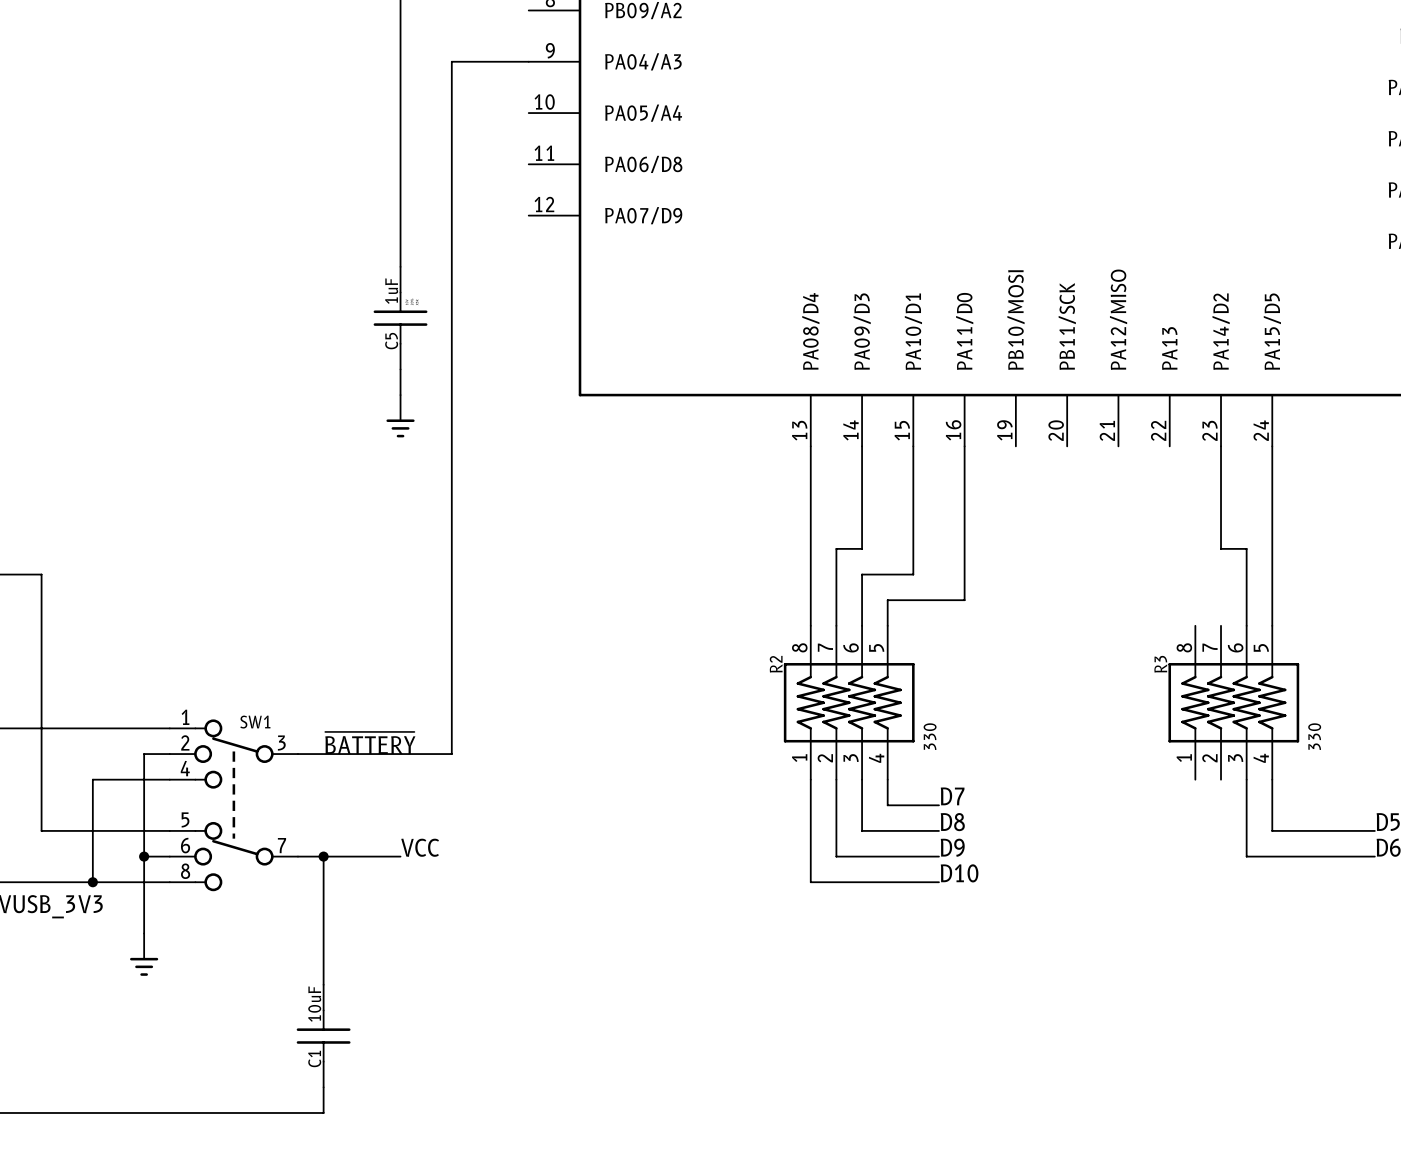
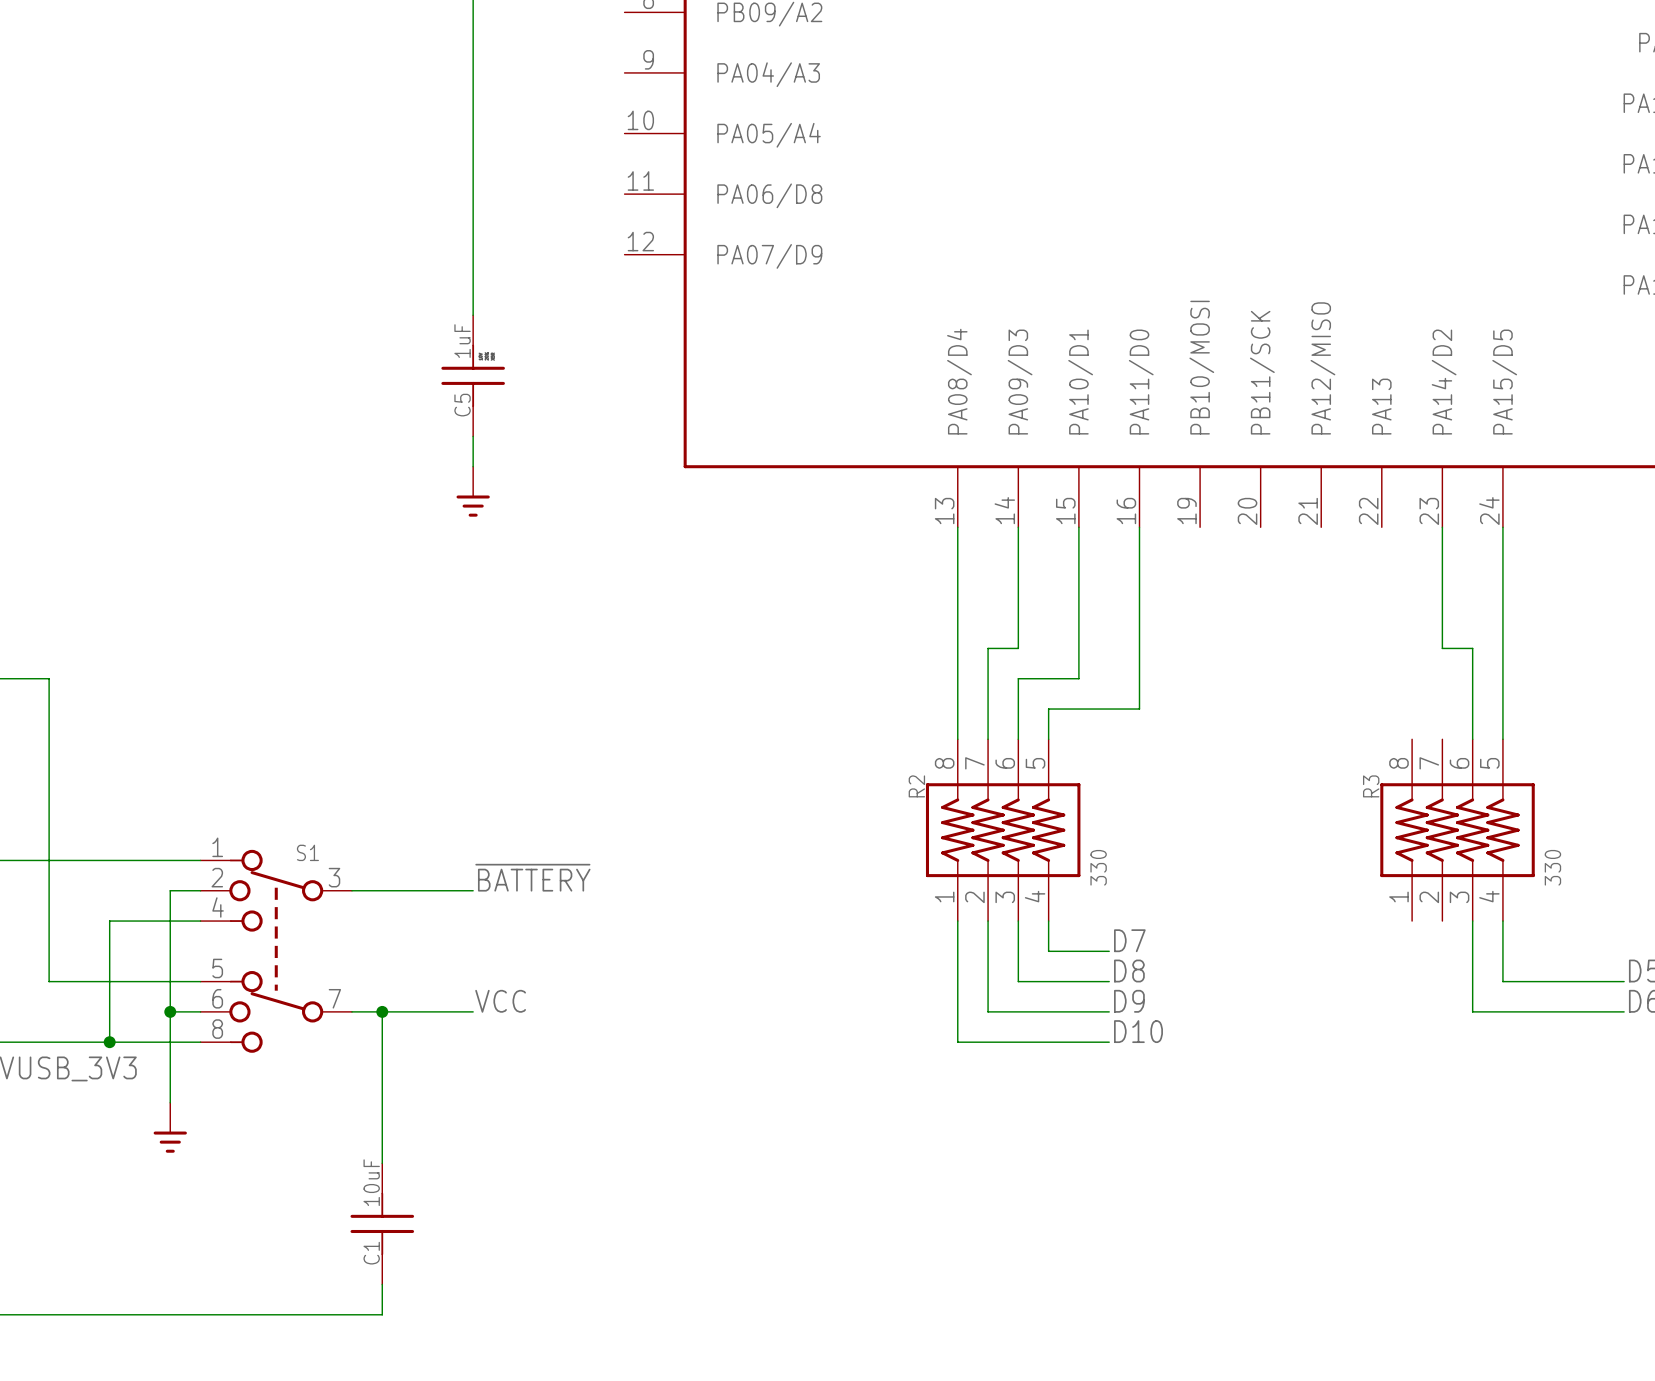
wire: (528, 61) (451, 61) (451, 754) (400, 754) -> none
SW1 name: SW1 (255, 722) -> S1 (307, 852)
label position: ~{BATTERY} (370, 742) -> ~{BATTERY} (532, 877)

